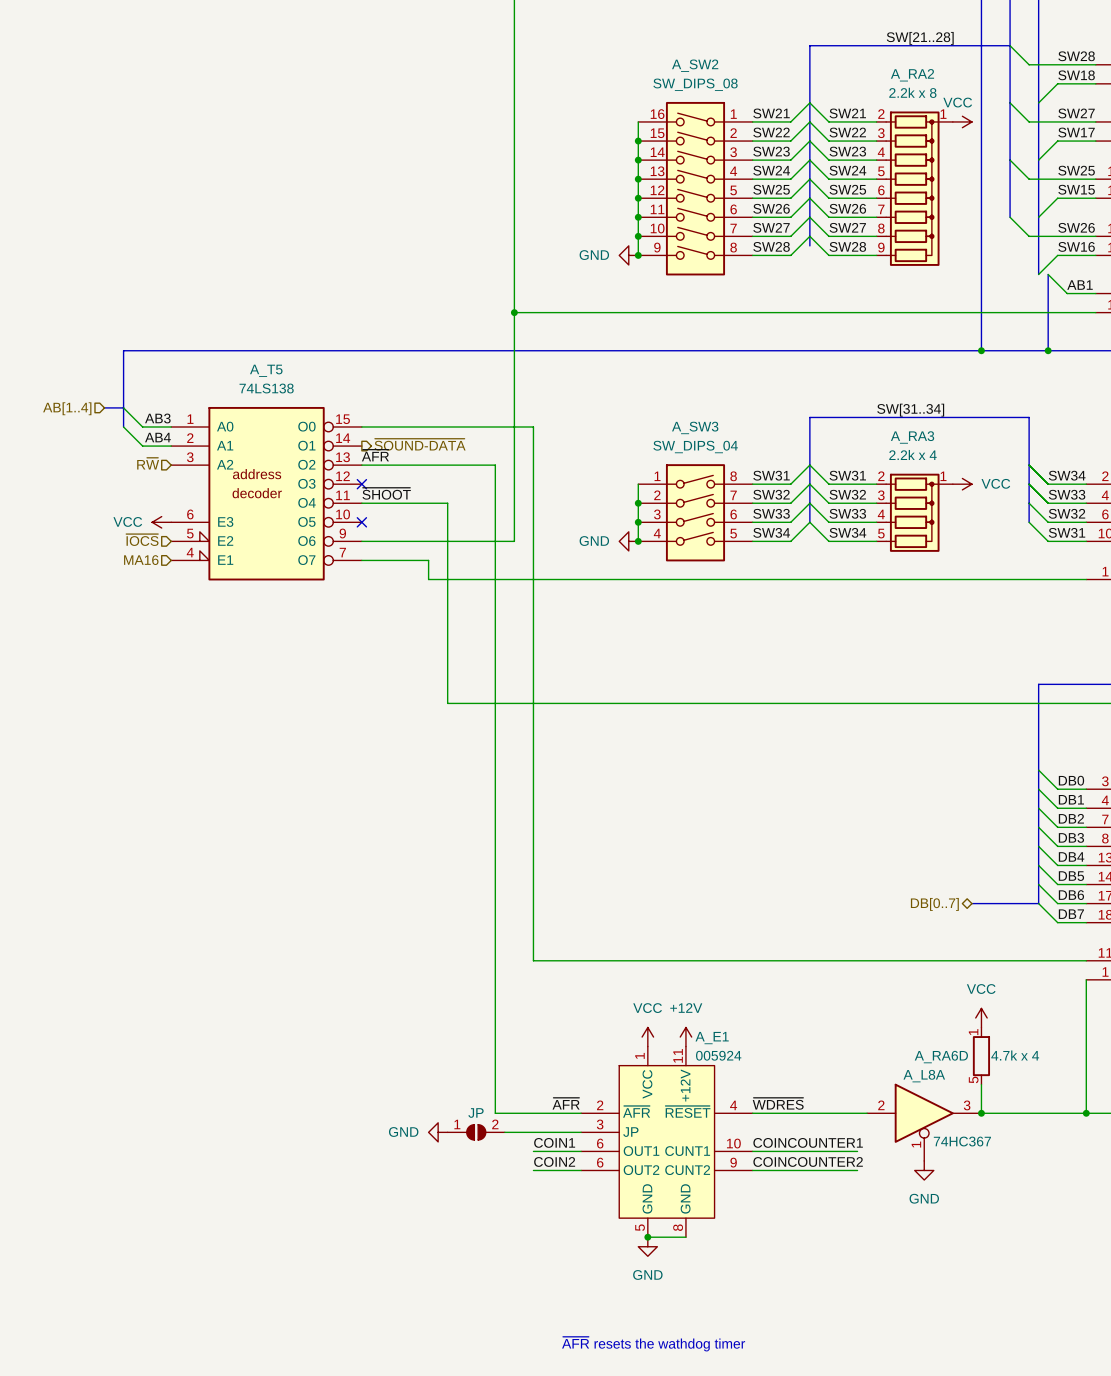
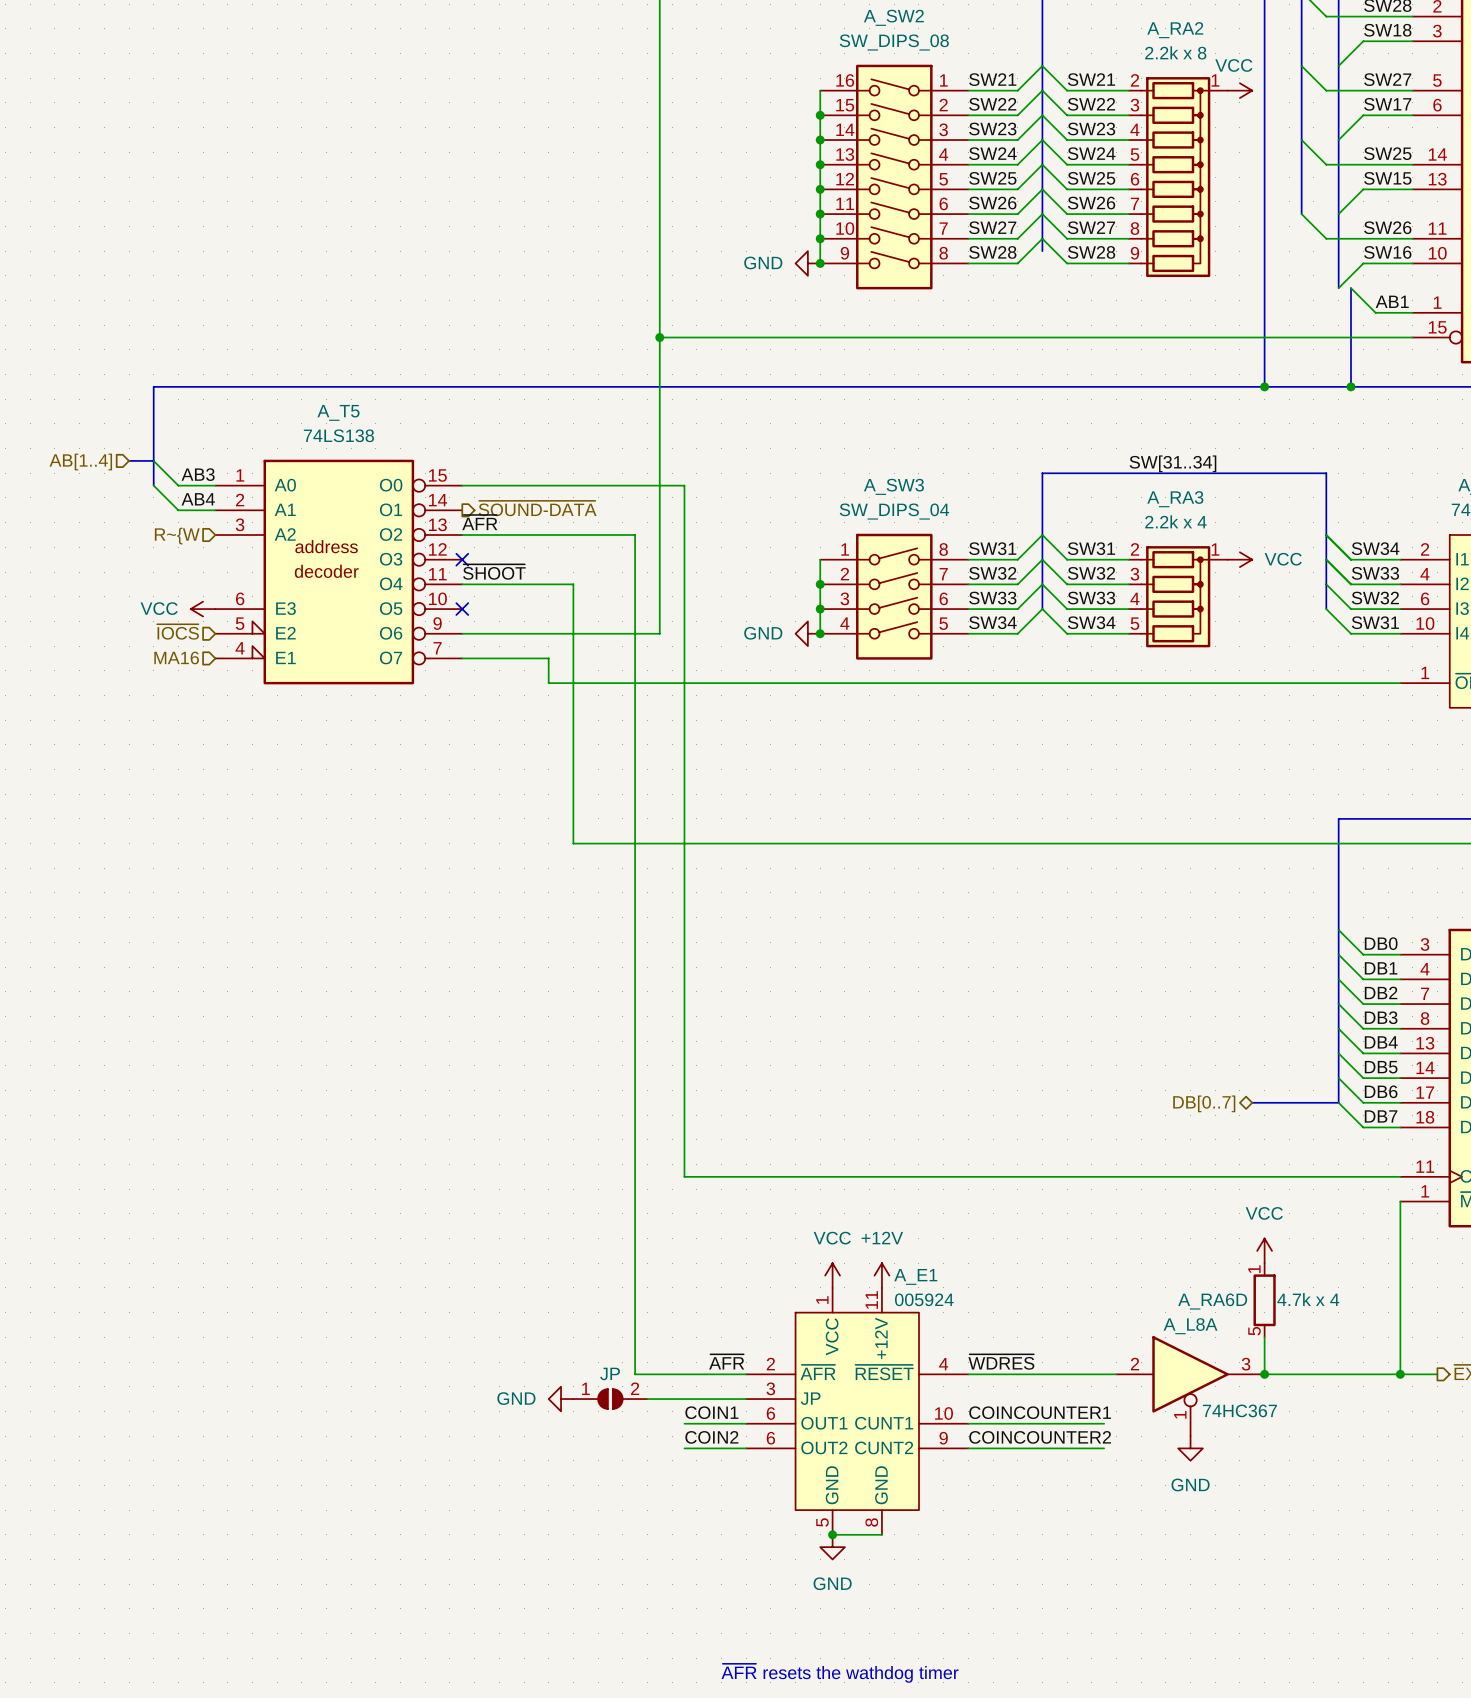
hierarchical label: R~{W} (148, 463) -> R~{W (177, 536)

